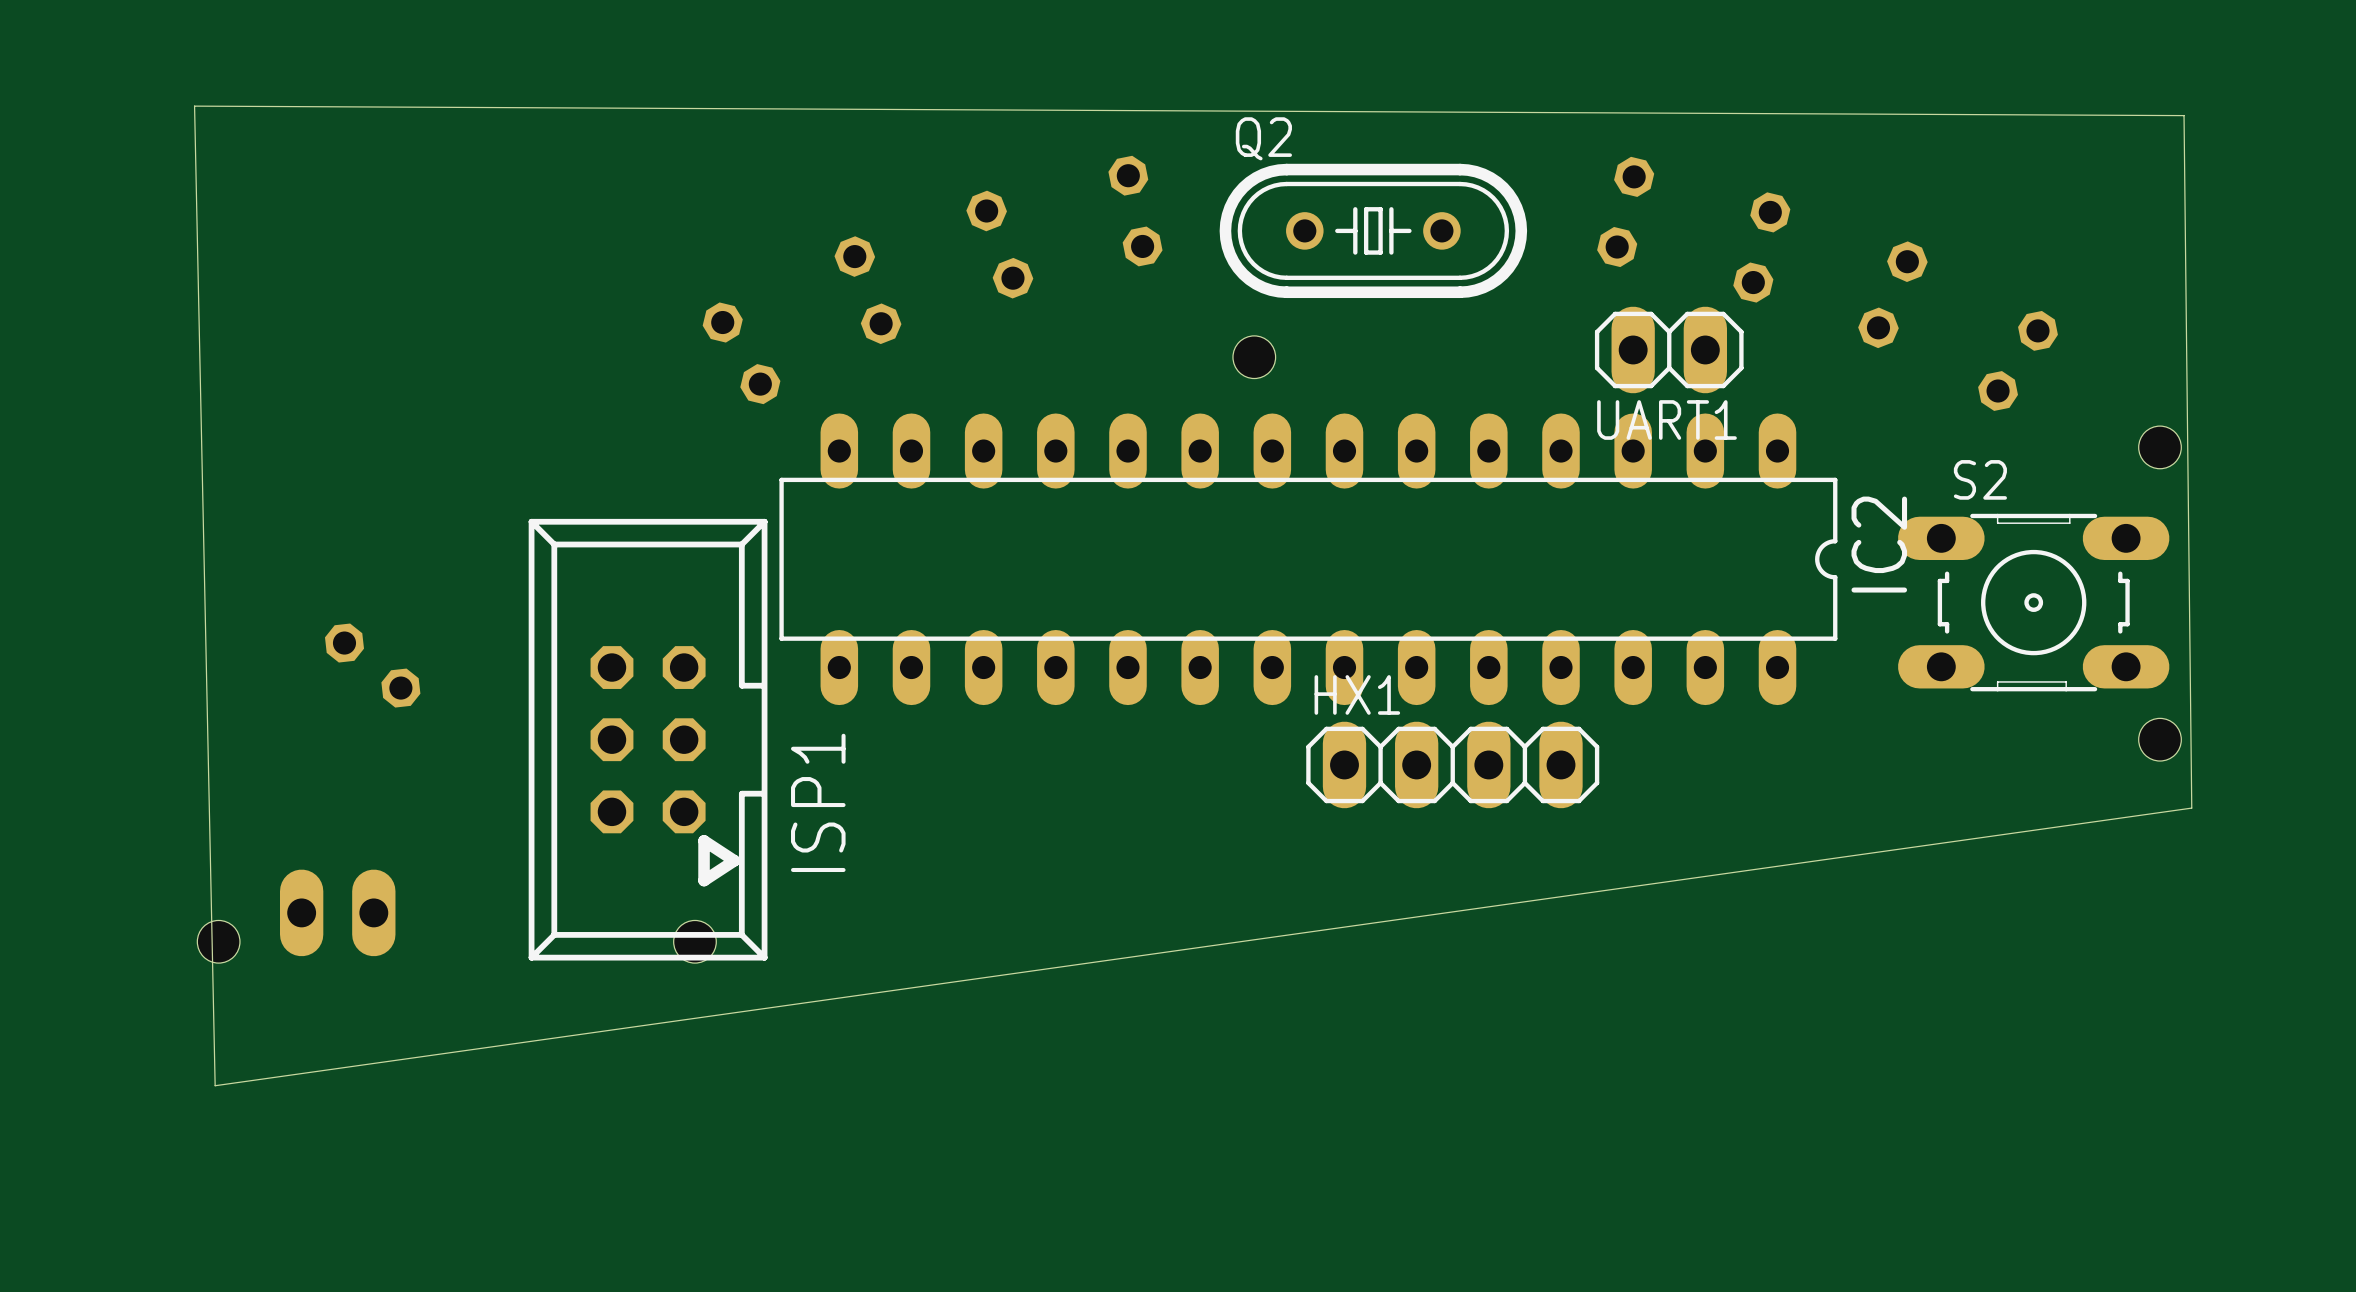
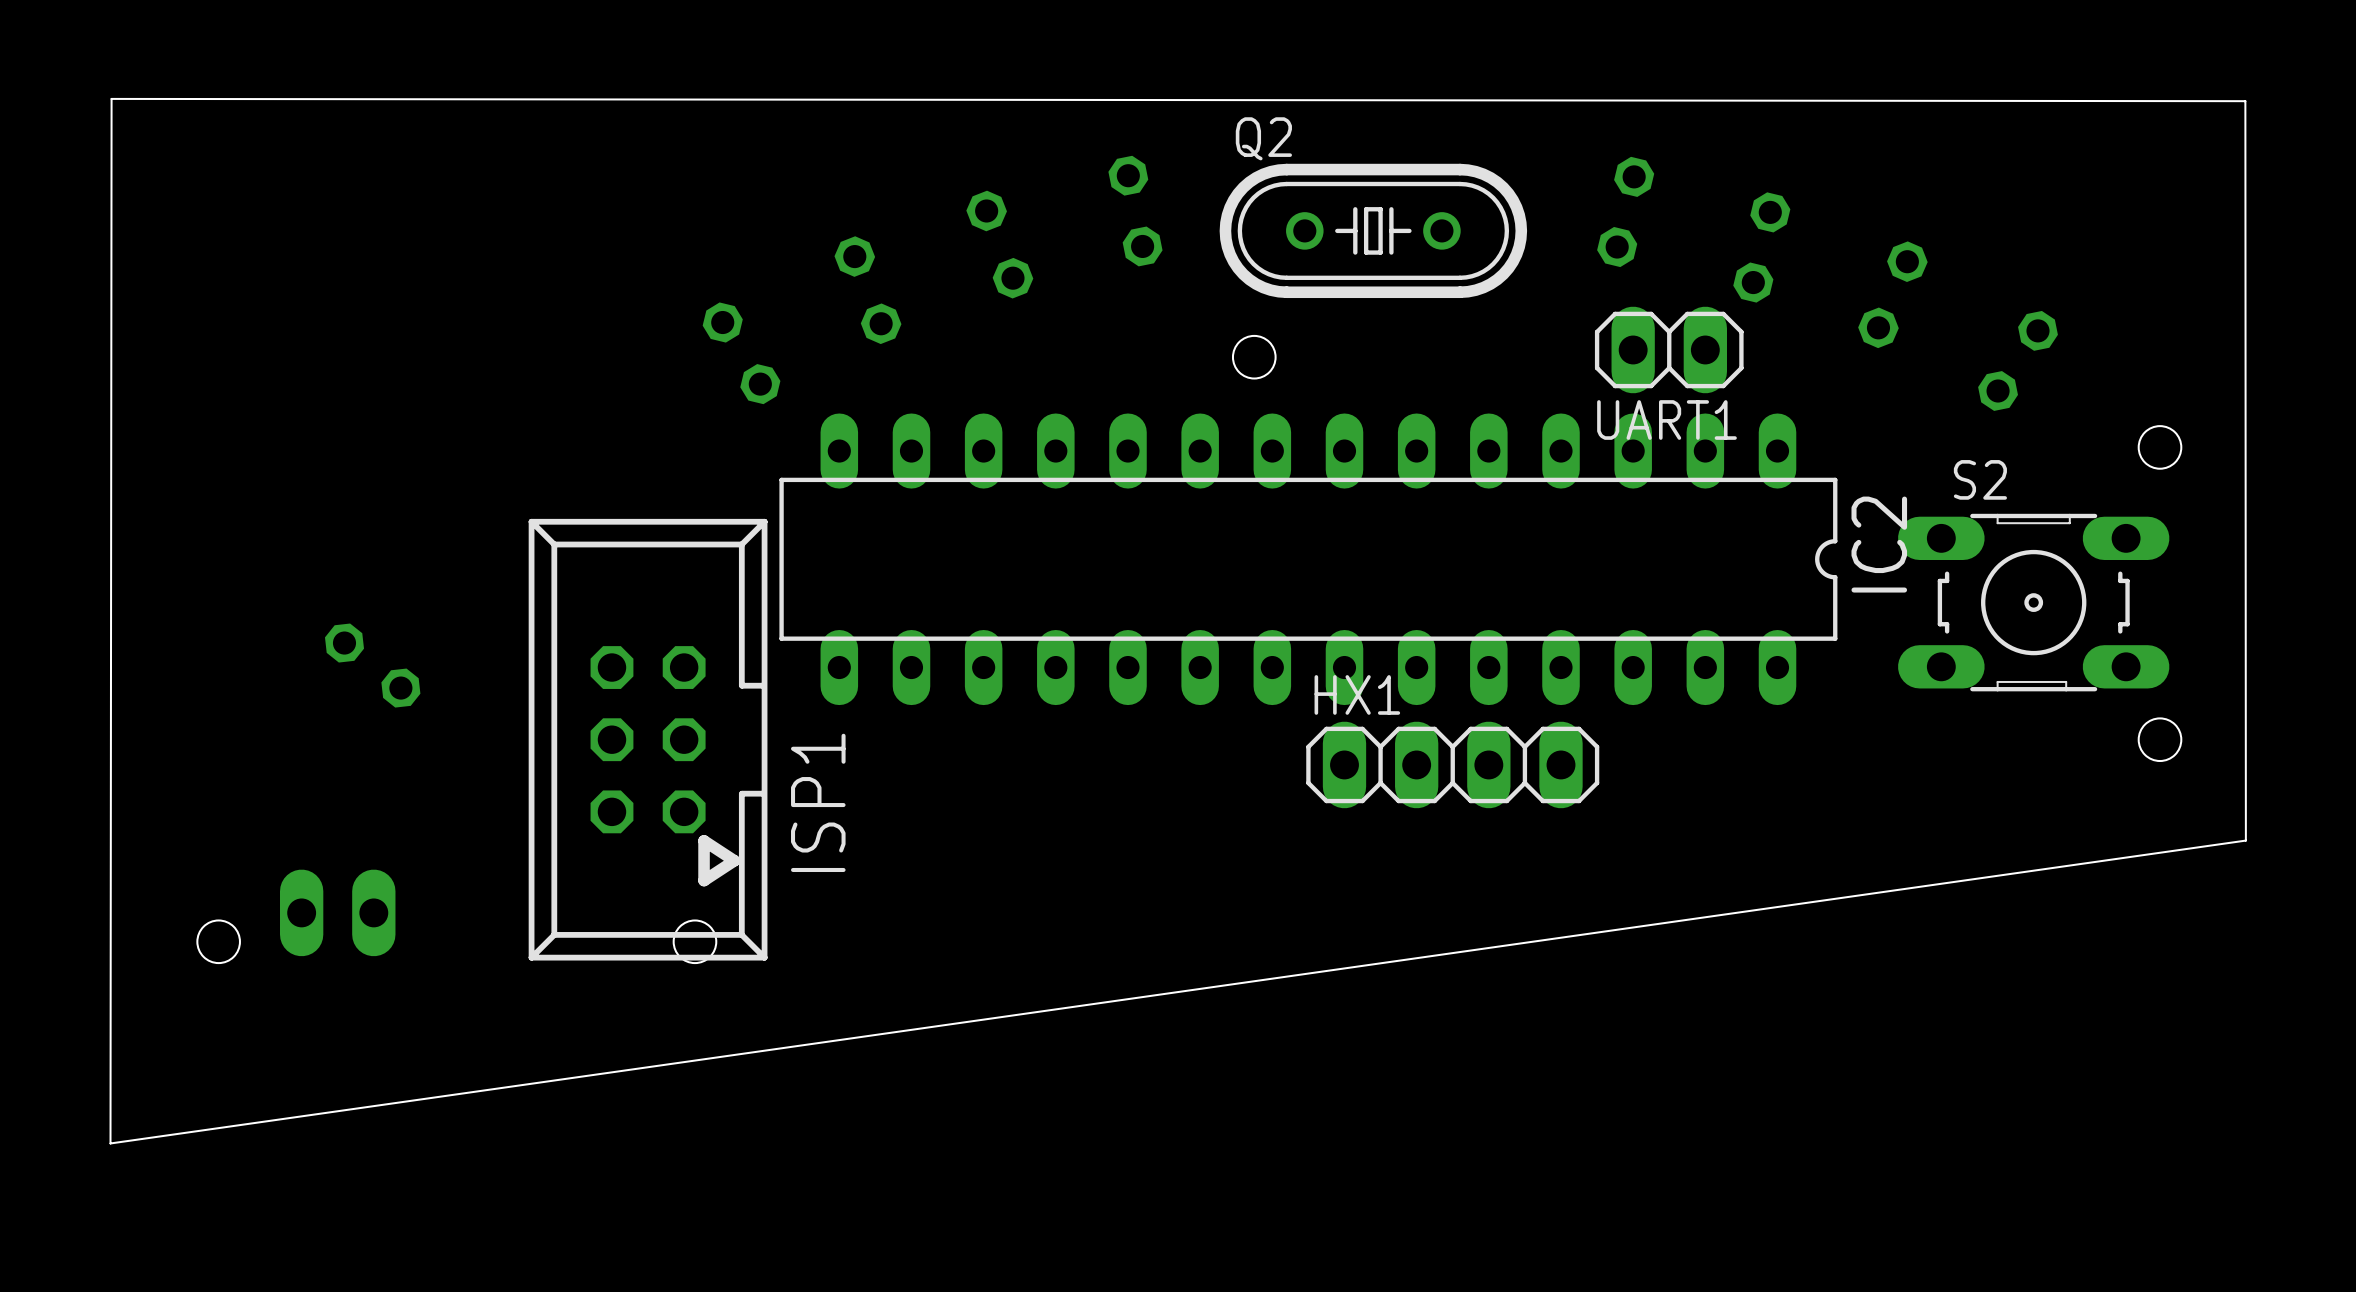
board edge: (194, 106) (2184, 115) (2191, 808) (215, 1085) (194, 106) -> (111, 98) (2245, 101) (2245, 840) (110, 1143) (111, 98)

